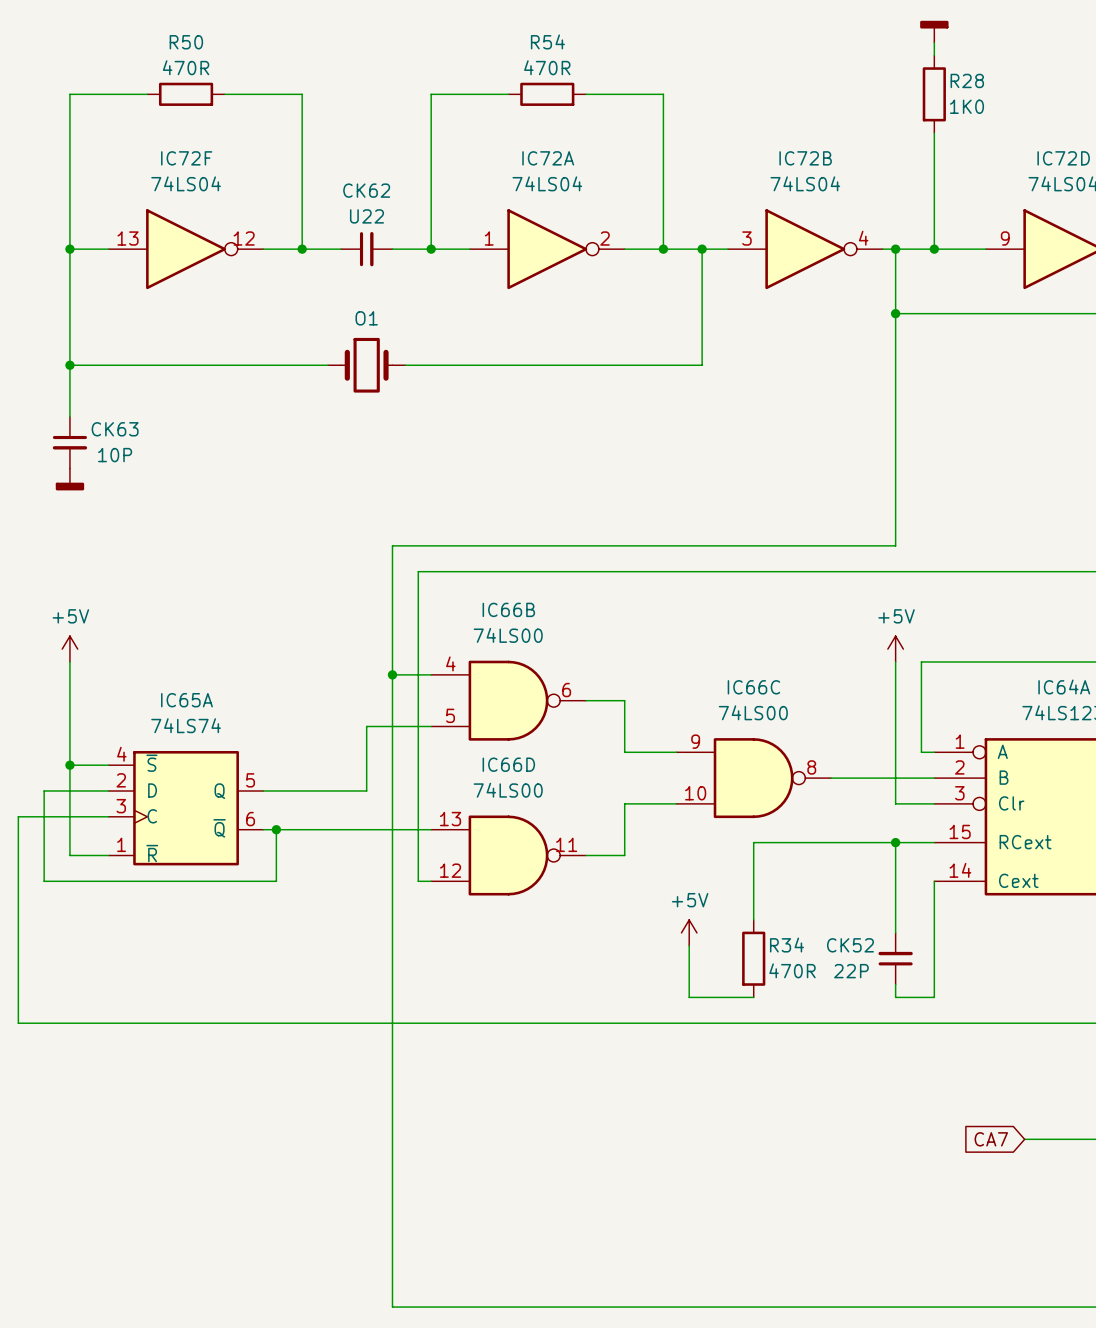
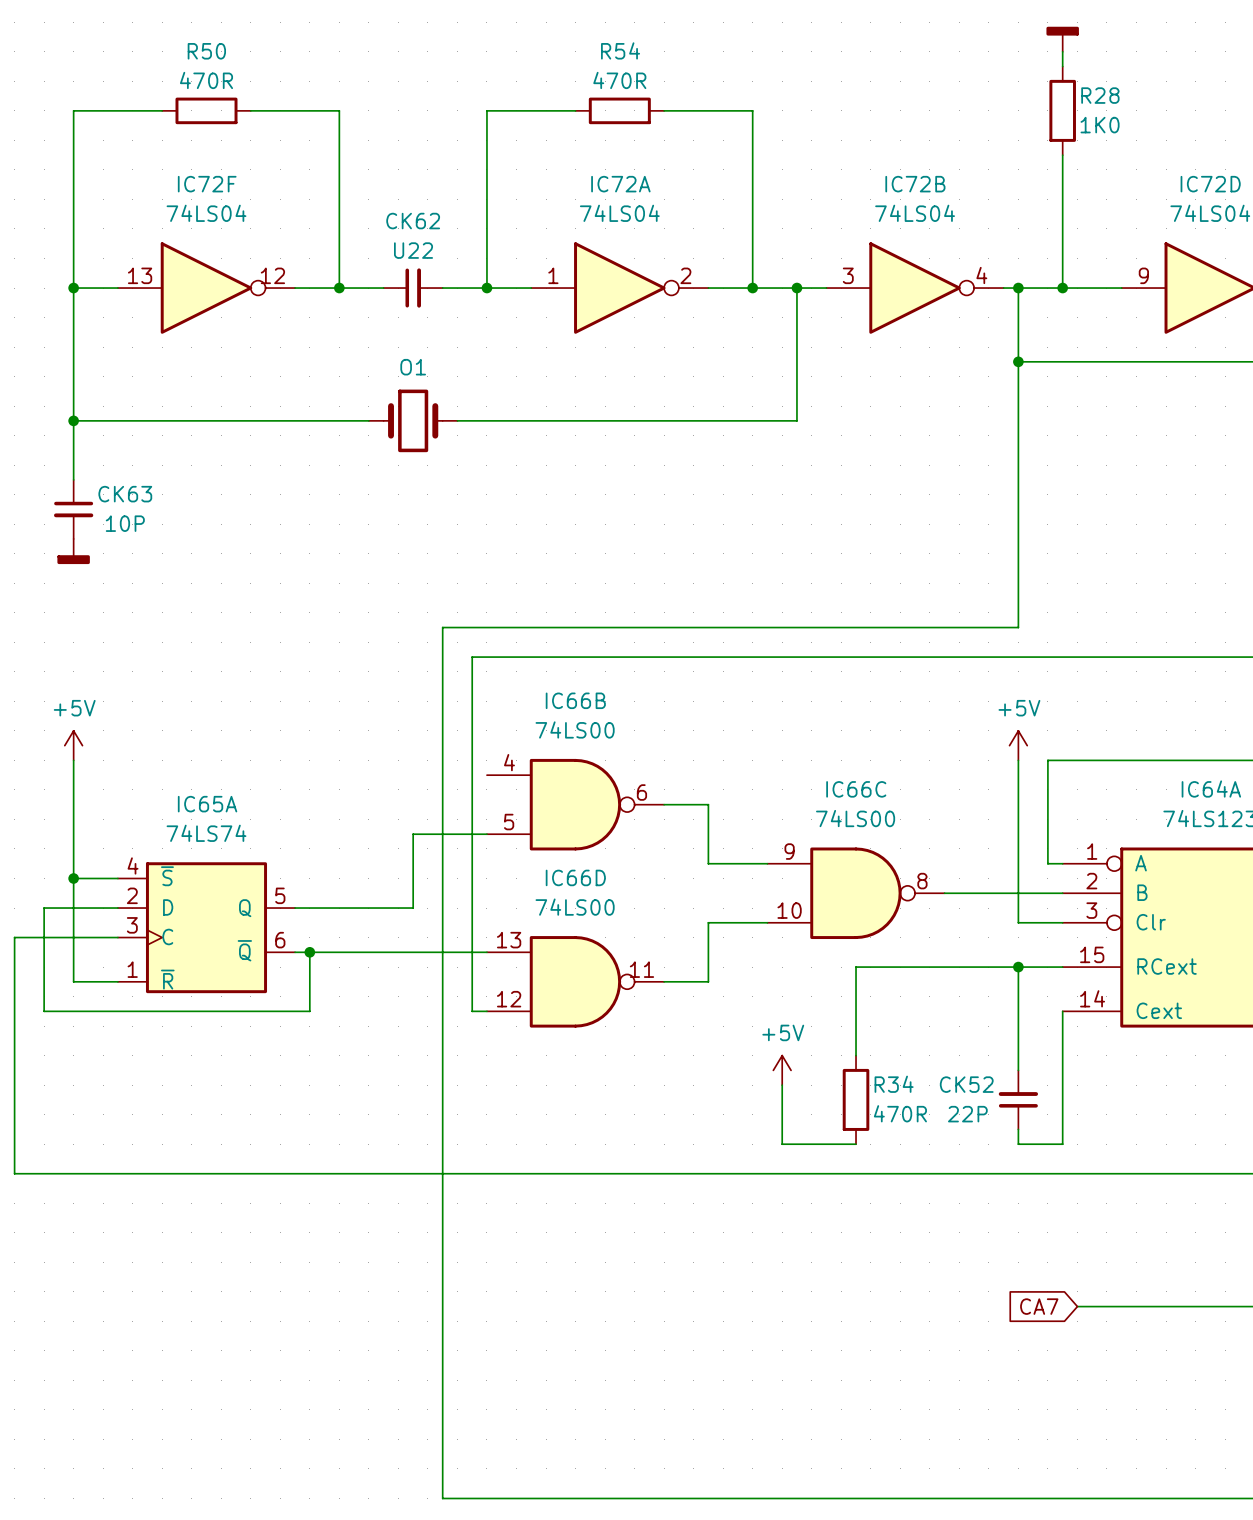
wire: (392, 674) (431, 674) -> none
junction: (392, 674) -> none
wire: none -> (1077, 1306) (1166, 1306)
global label position: CA7 (991, 1139) -> CA7 (1039, 1306)

